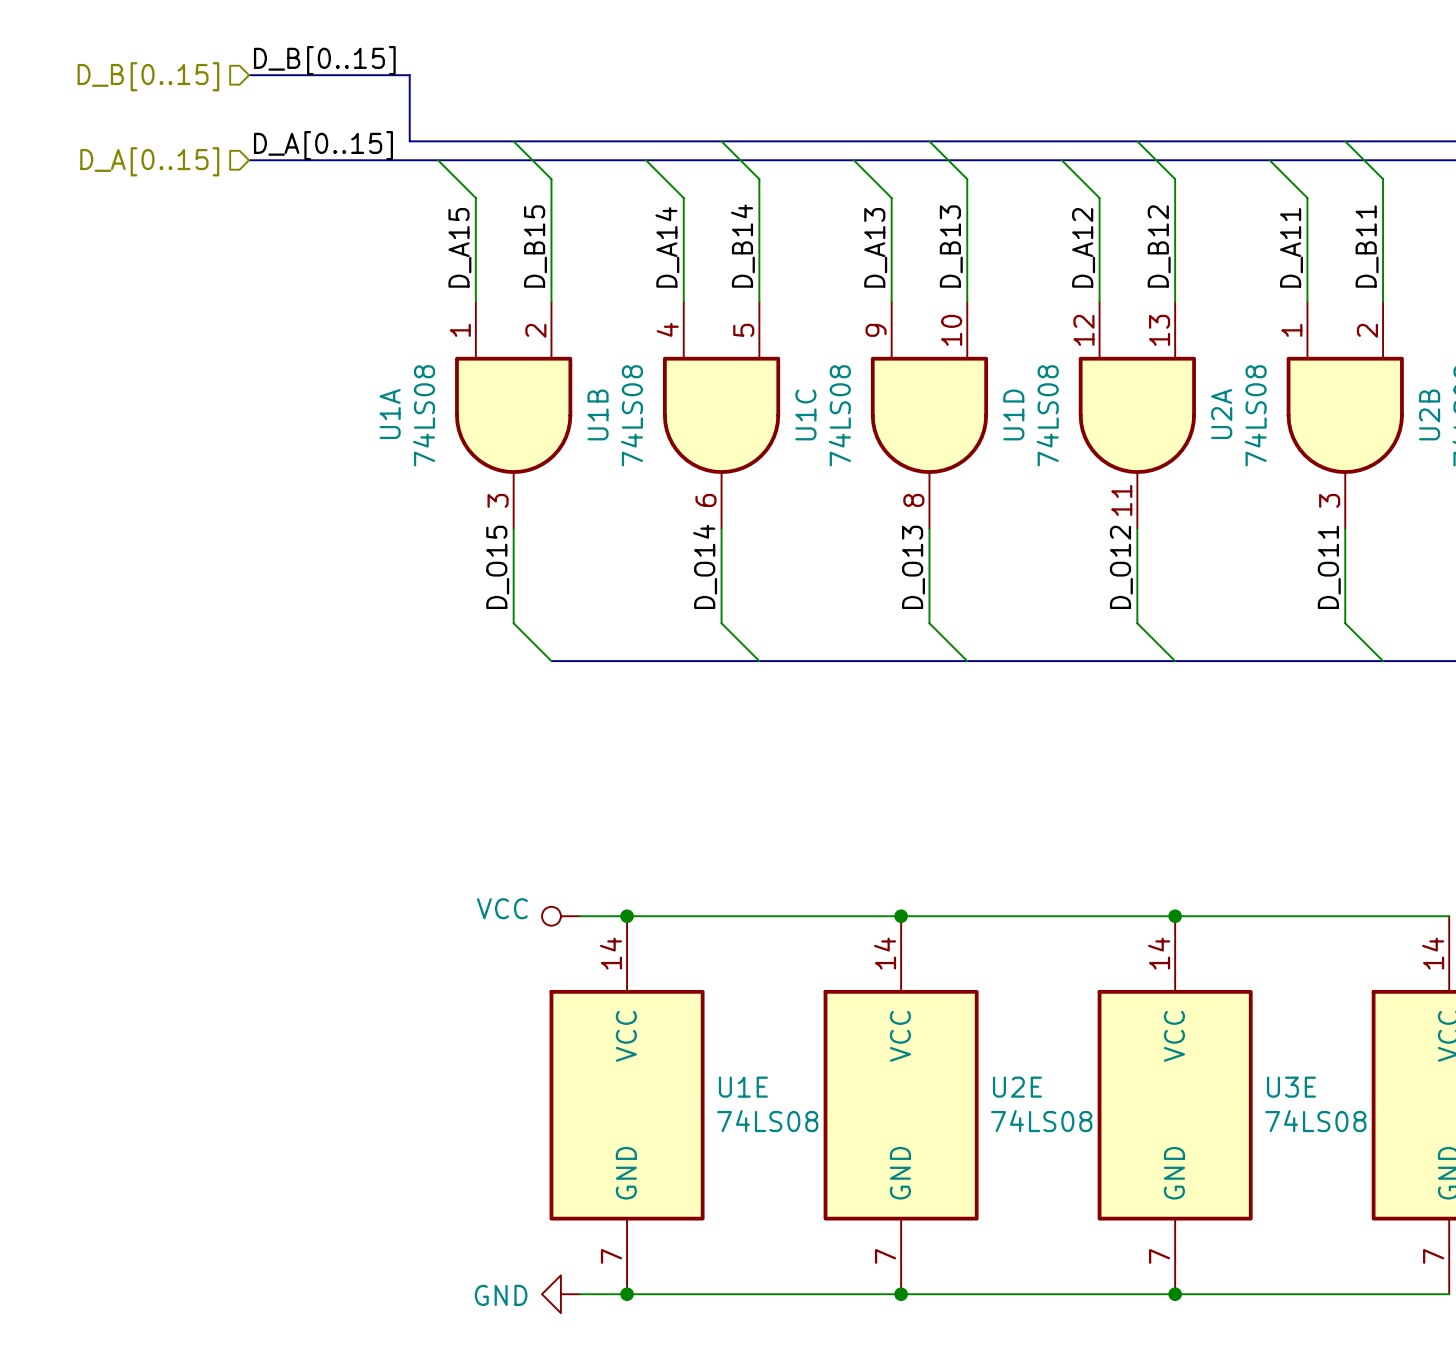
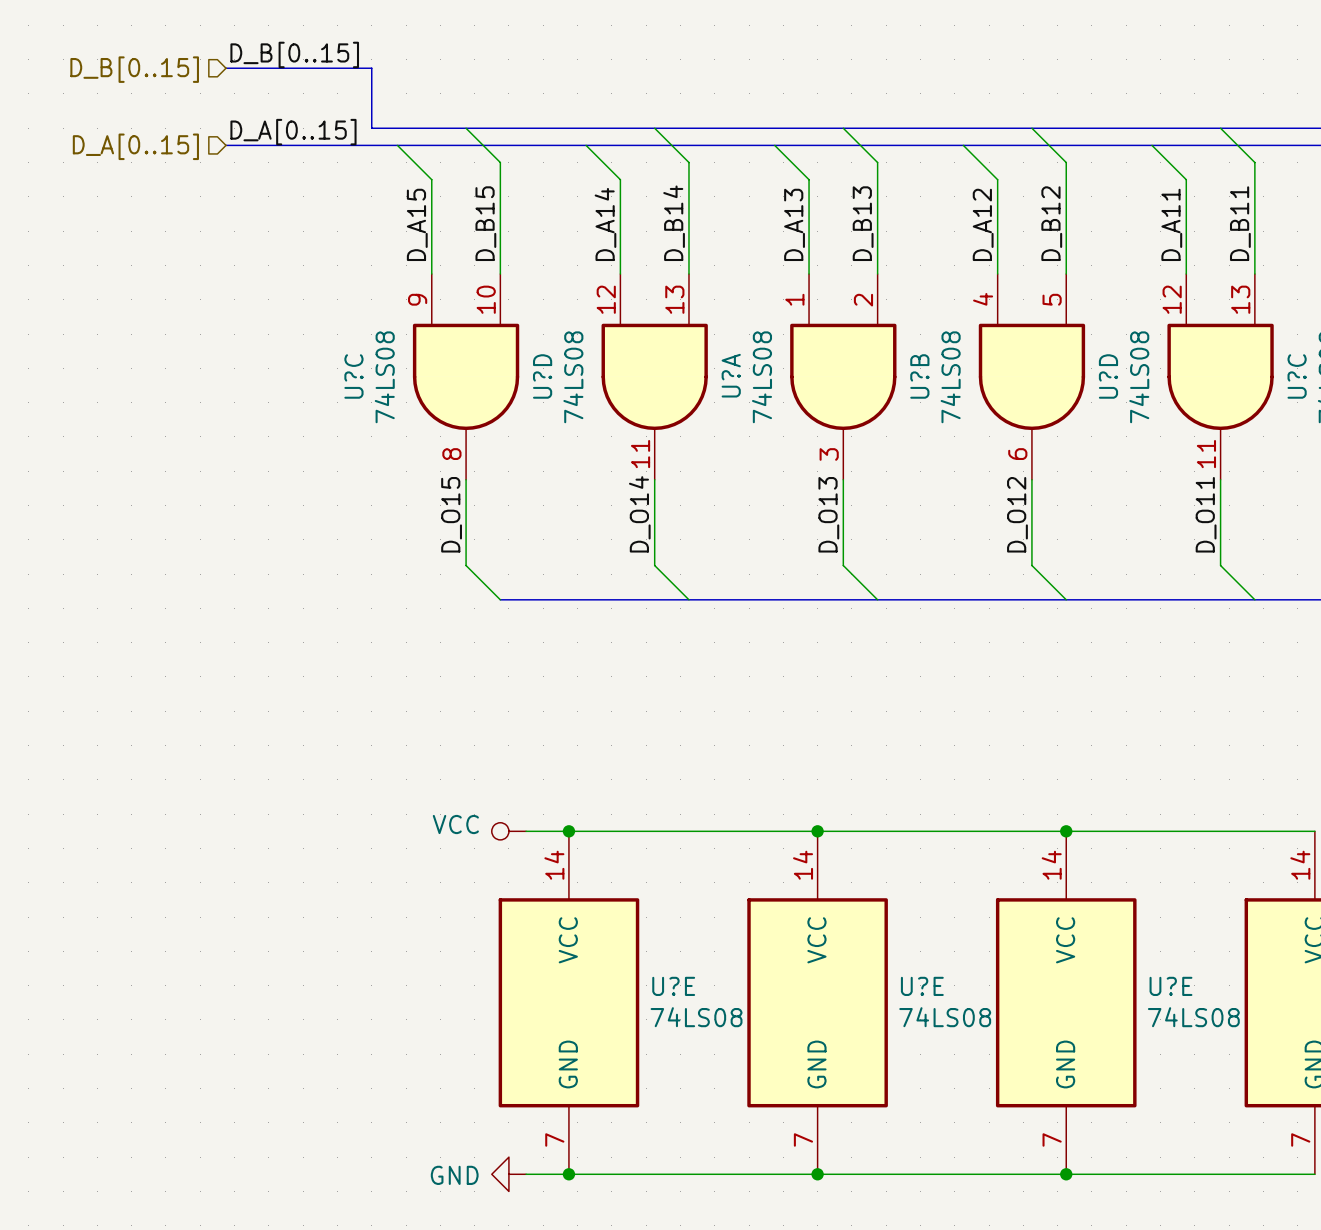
U1B pin number: 4 (667, 329) -> 12 (606, 299)
U1A pin number: 1 (460, 330) -> 9 (417, 299)
U1A pin number: 2 (535, 330) -> 10 (486, 299)
U1B pin number: 5 (743, 330) -> 13 (674, 299)
U1C pin number: 9 (876, 330) -> 1 (794, 299)
U1C pin number: 10 (951, 330) -> 2 (863, 300)
U1D pin number: 12 (1083, 330) -> 4 (983, 299)
U1D pin number: 13 (1159, 330) -> 5 (1052, 299)
U2A pin number: 1 (1291, 330) -> 12 (1172, 299)
U2A pin number: 2 (1367, 330) -> 13 (1240, 299)
U1A name: U1A (390, 414) -> U?C (353, 376)
U1B name: U1B (598, 414) -> U?D (542, 376)
U1C name: U1C (805, 414) -> U?A (731, 375)
U1D name: U1D (1013, 414) -> U?B (919, 376)
U2A name: U2A (1221, 414) -> U?D (1108, 376)
U2B name: U2B (1429, 414) -> U?C (1297, 376)
U1A pin number: 3 (498, 500) -> 8 (451, 454)
U1B pin number: 6 (705, 500) -> 11 (640, 454)
U1C pin number: 8 (913, 500) -> 3 (829, 454)
U1D pin number: 11 (1121, 500) -> 6 (1017, 454)
U2A pin number: 3 (1329, 500) -> 11 (1206, 454)
U1E name: U1E (743, 1087) -> U?E (673, 986)
U2E name: U2E (1017, 1087) -> U?E (922, 986)
U3E name: U3E (1291, 1087) -> U?E (1170, 986)

